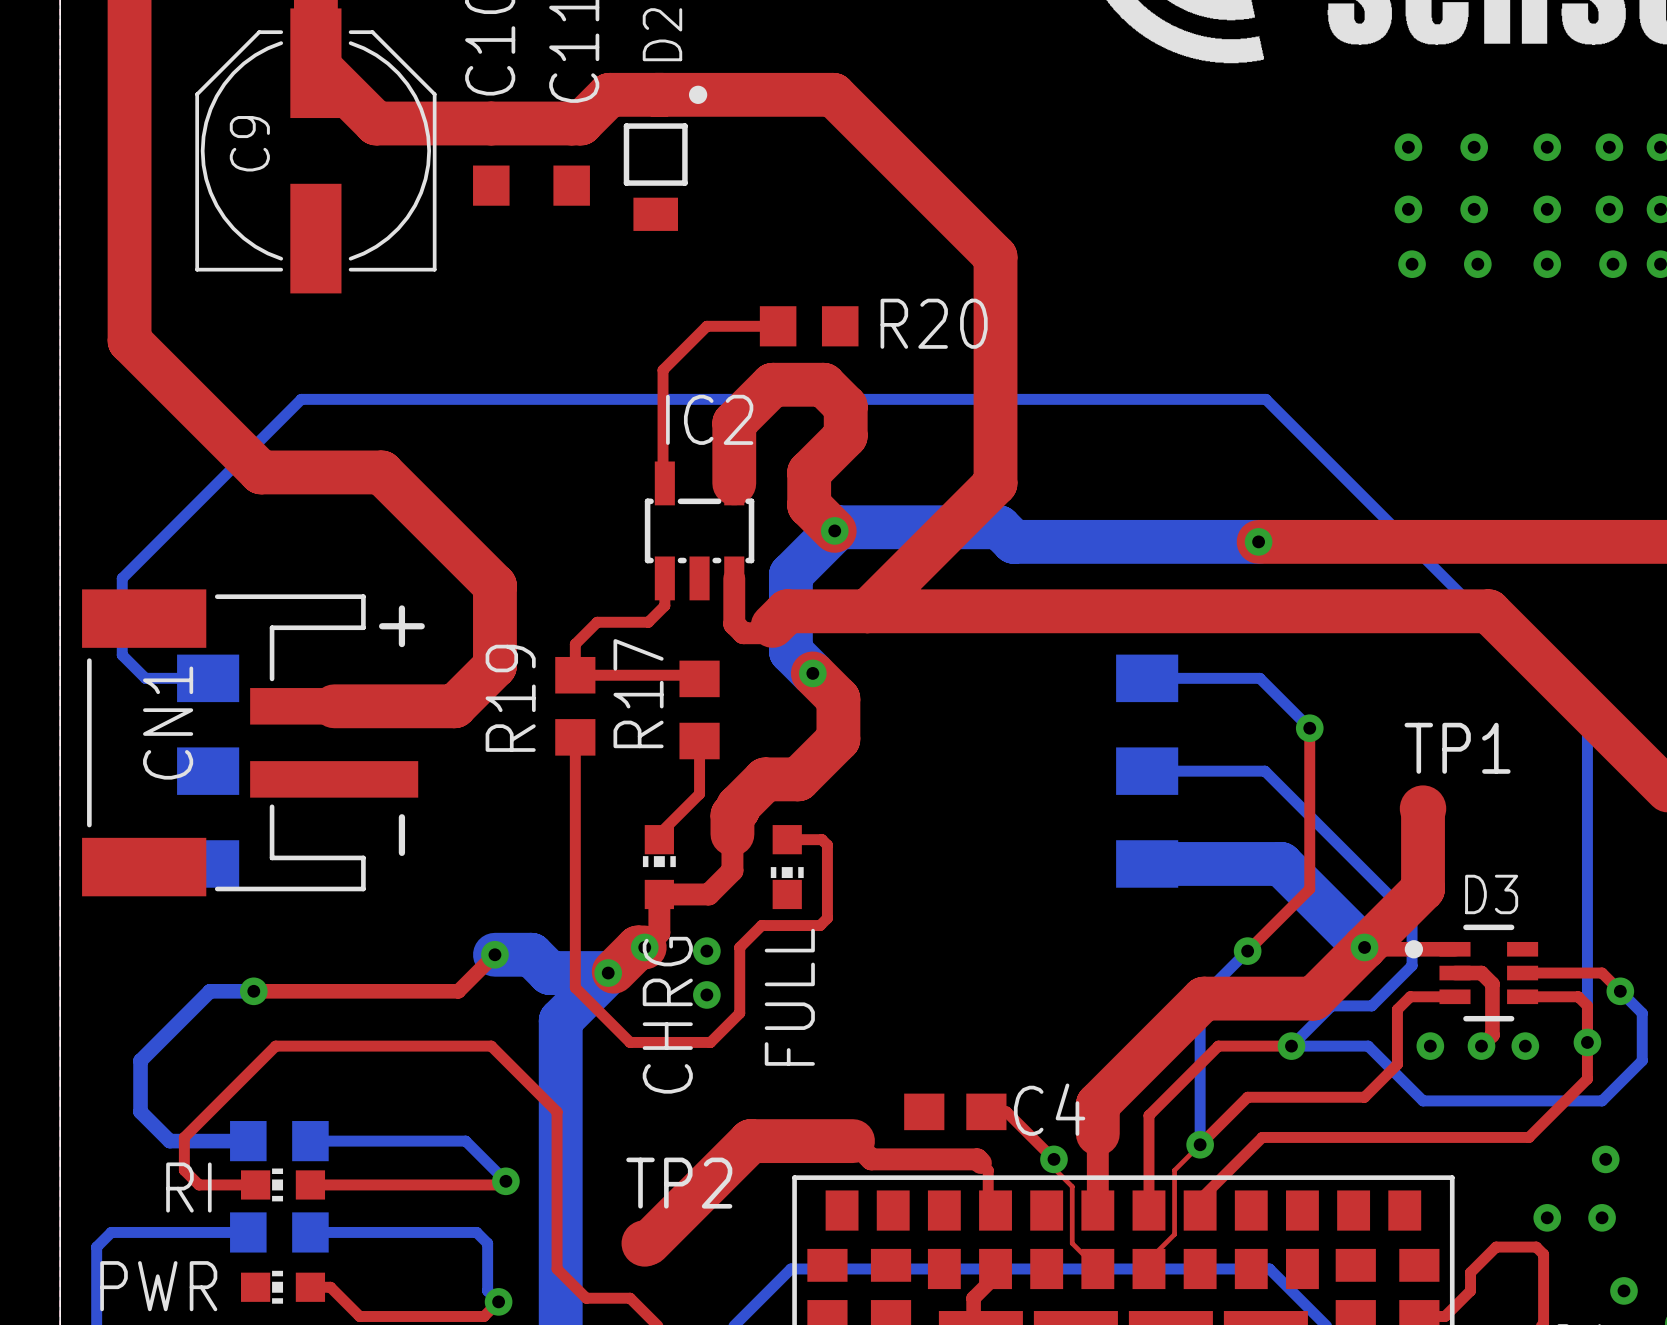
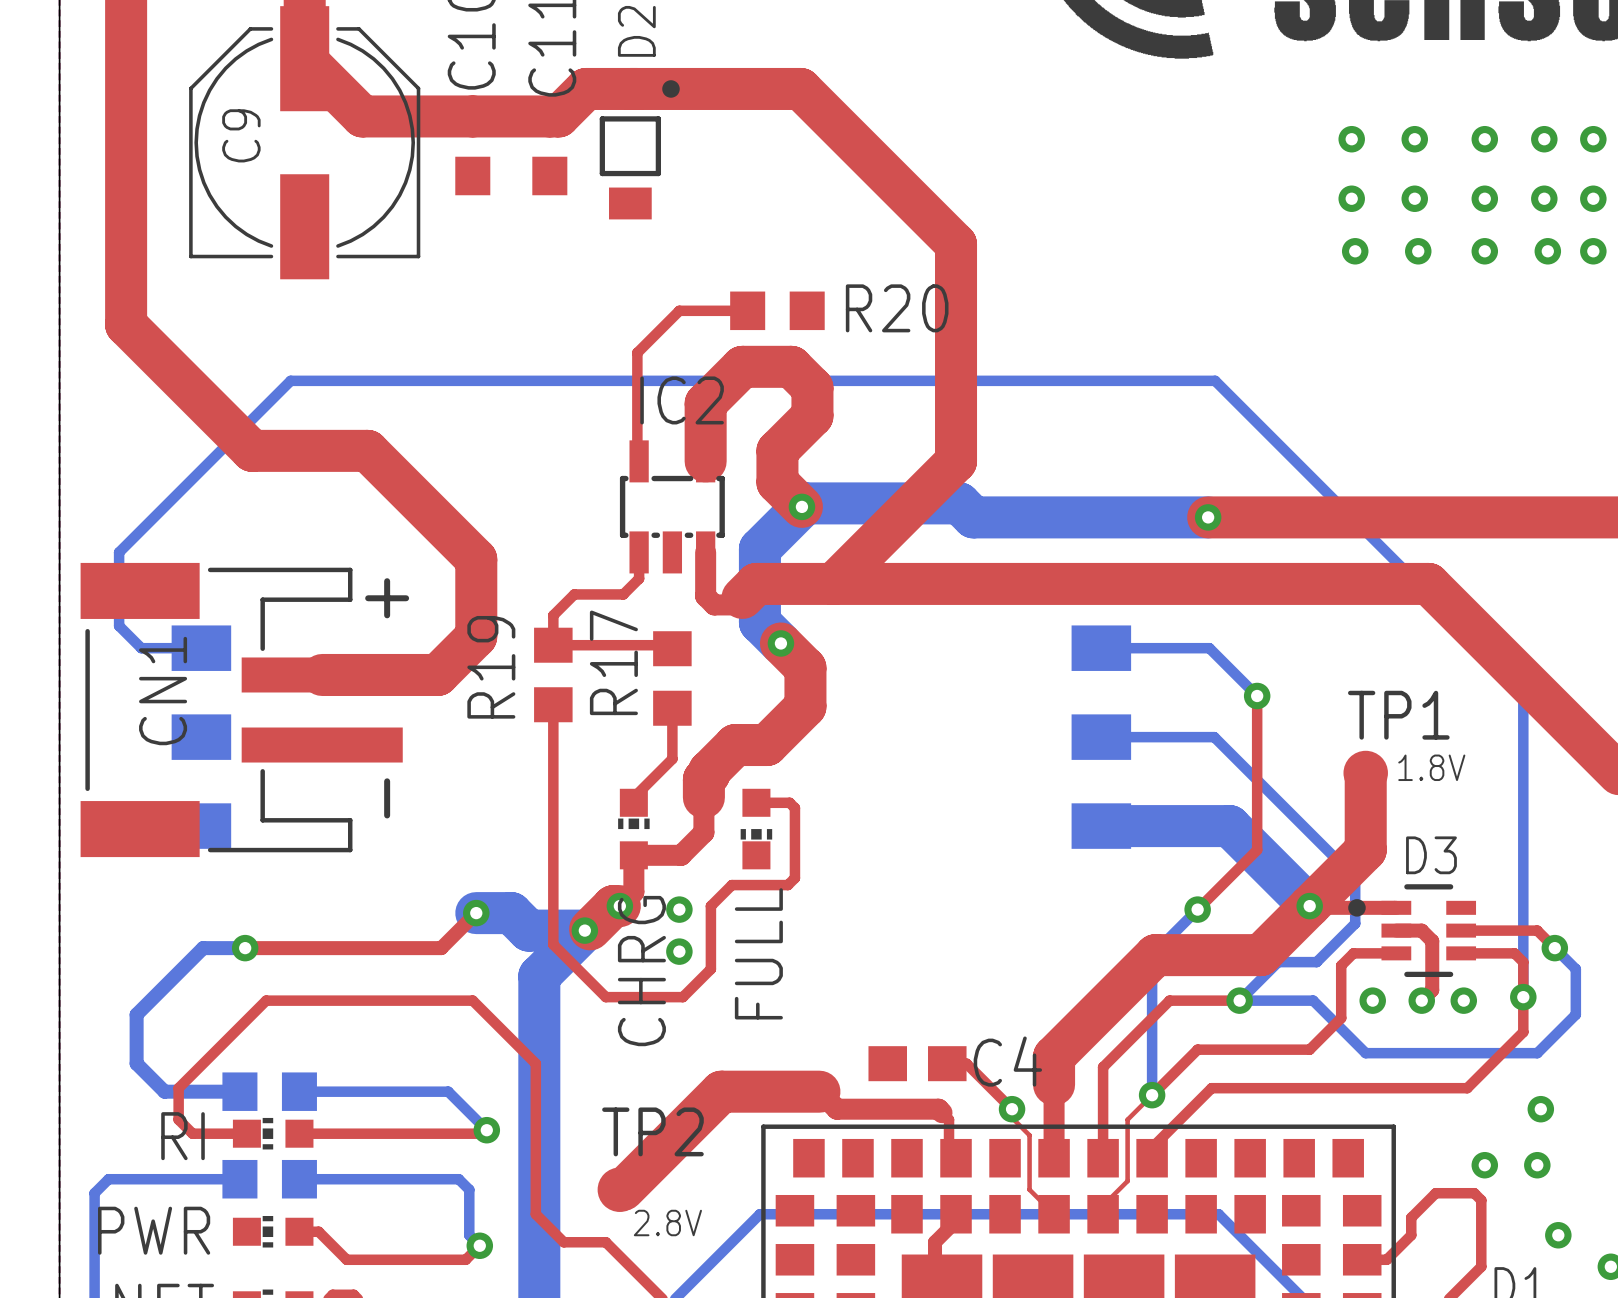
text: none -> 1.8V (1431, 767)
text: none -> 2.8V (667, 1223)

